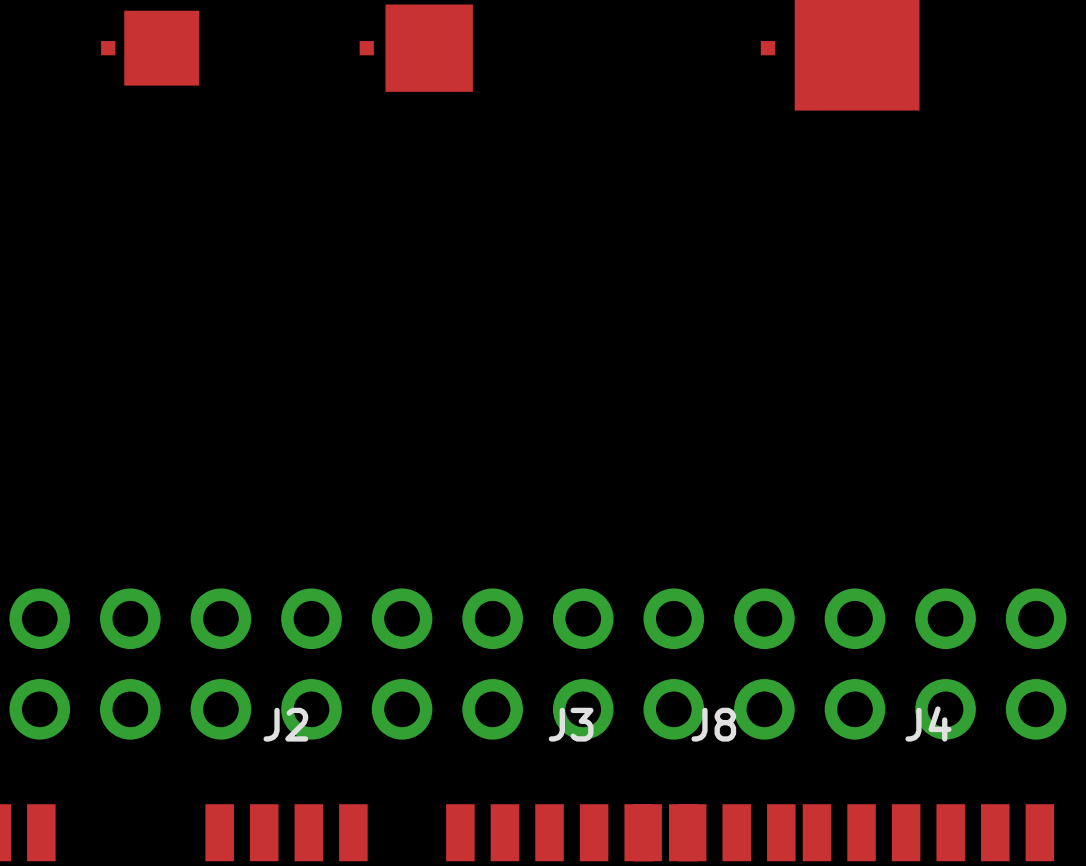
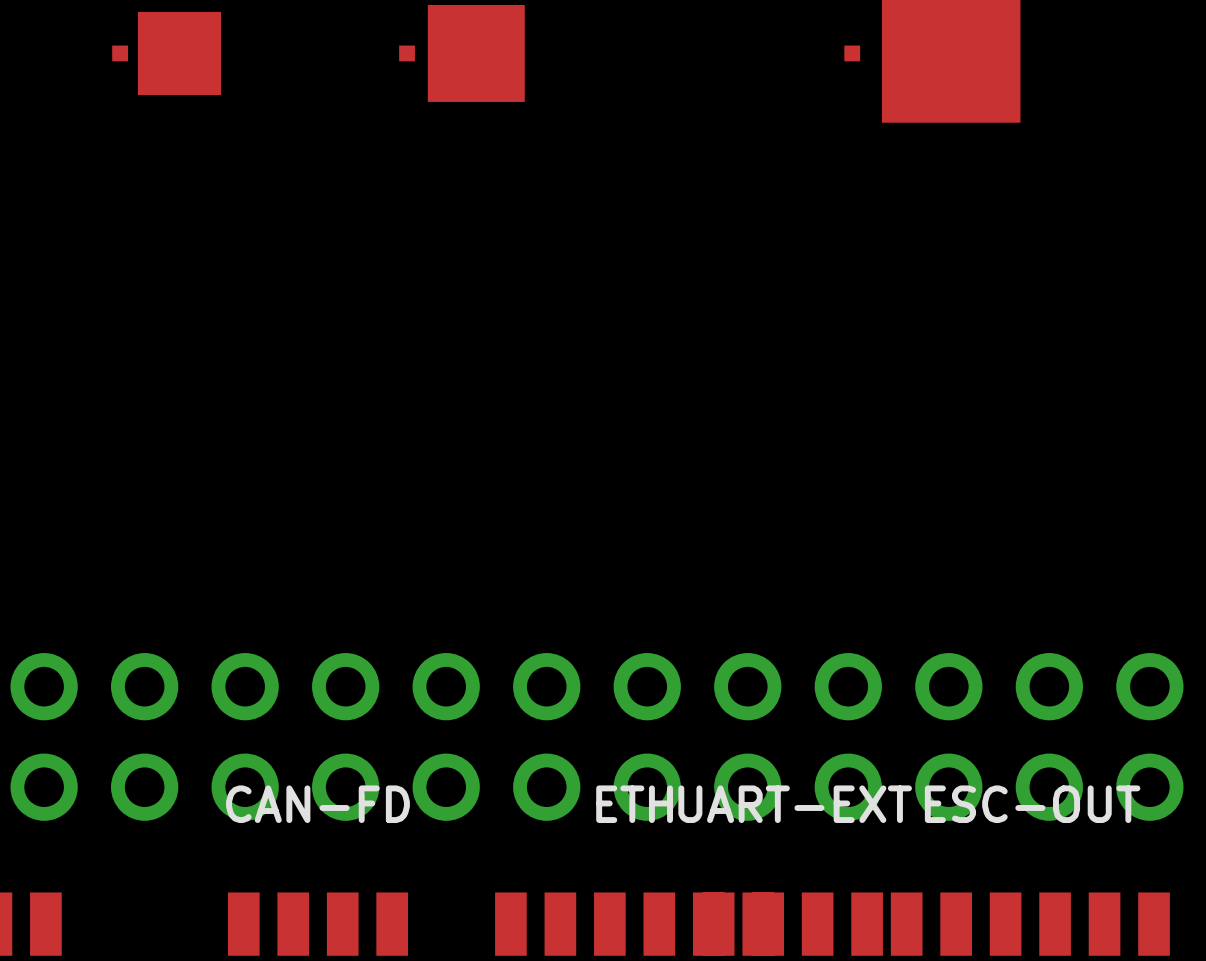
J4 name: J4 (928, 723) -> ESC-OUT (1032, 804)
J2 name: J2 (285, 724) -> CAN-FD (317, 804)
J3 name: J3 (571, 724) -> ETH (634, 804)
J8 name: J8 (713, 724) -> UART-EXT (795, 804)

